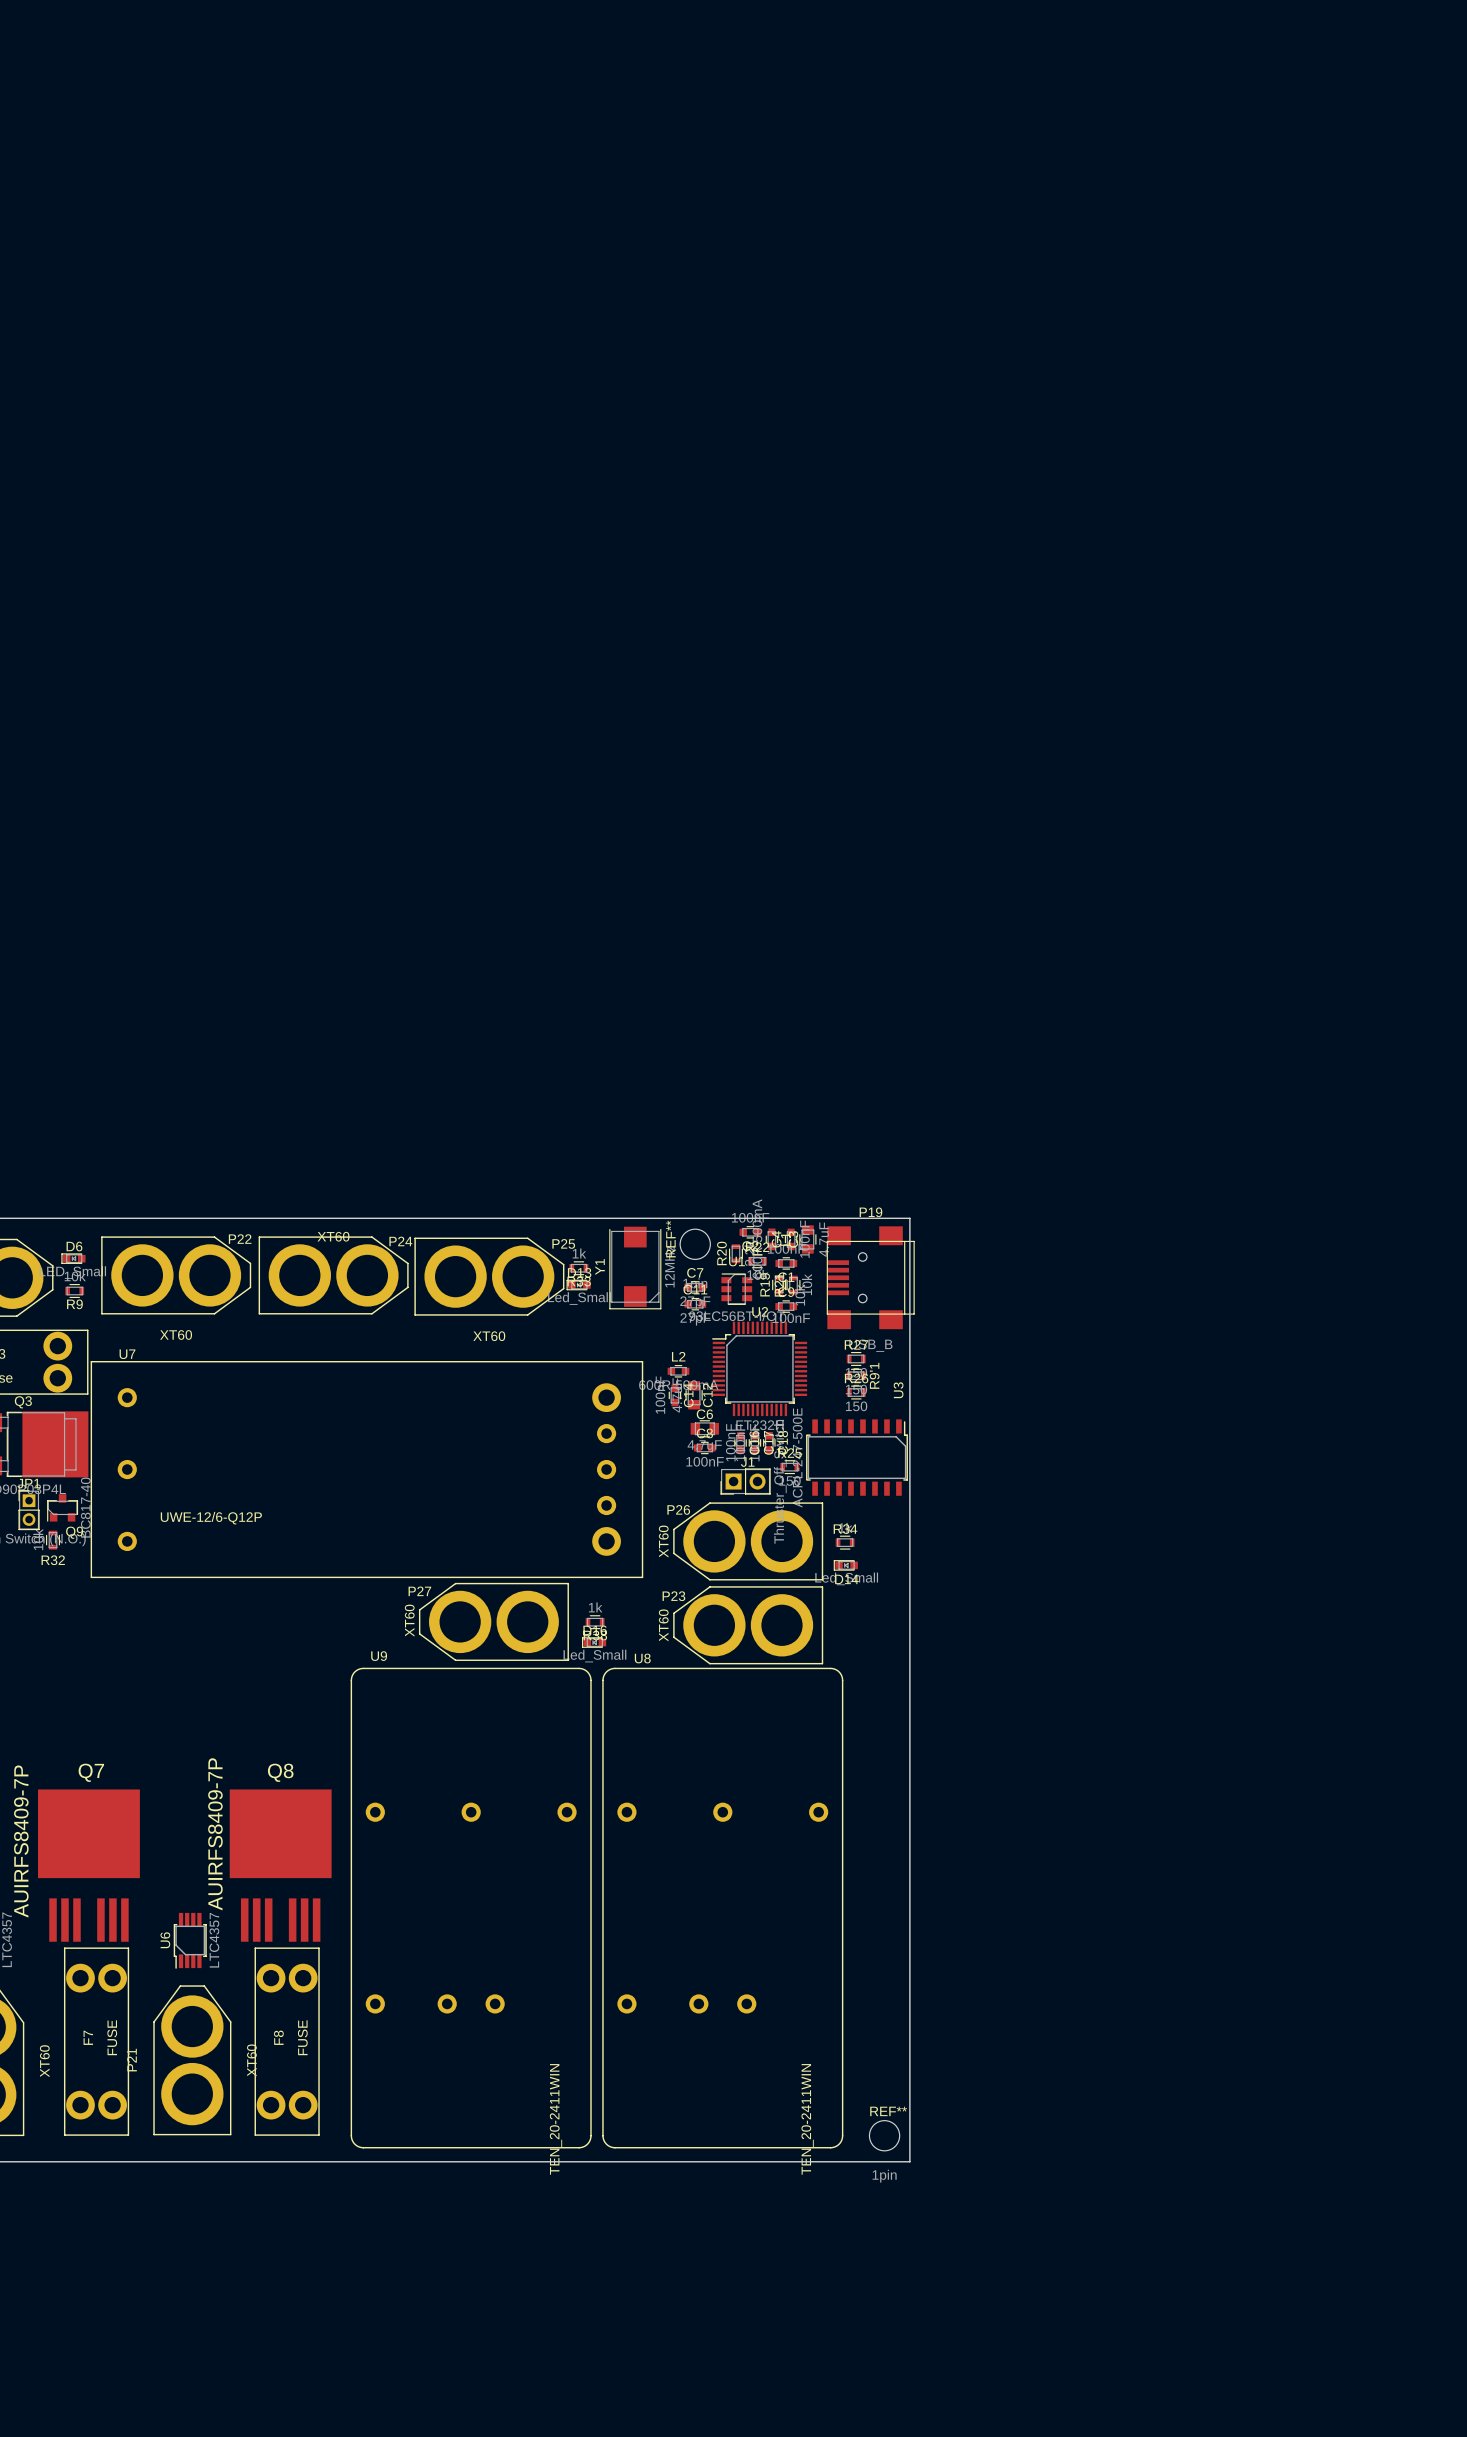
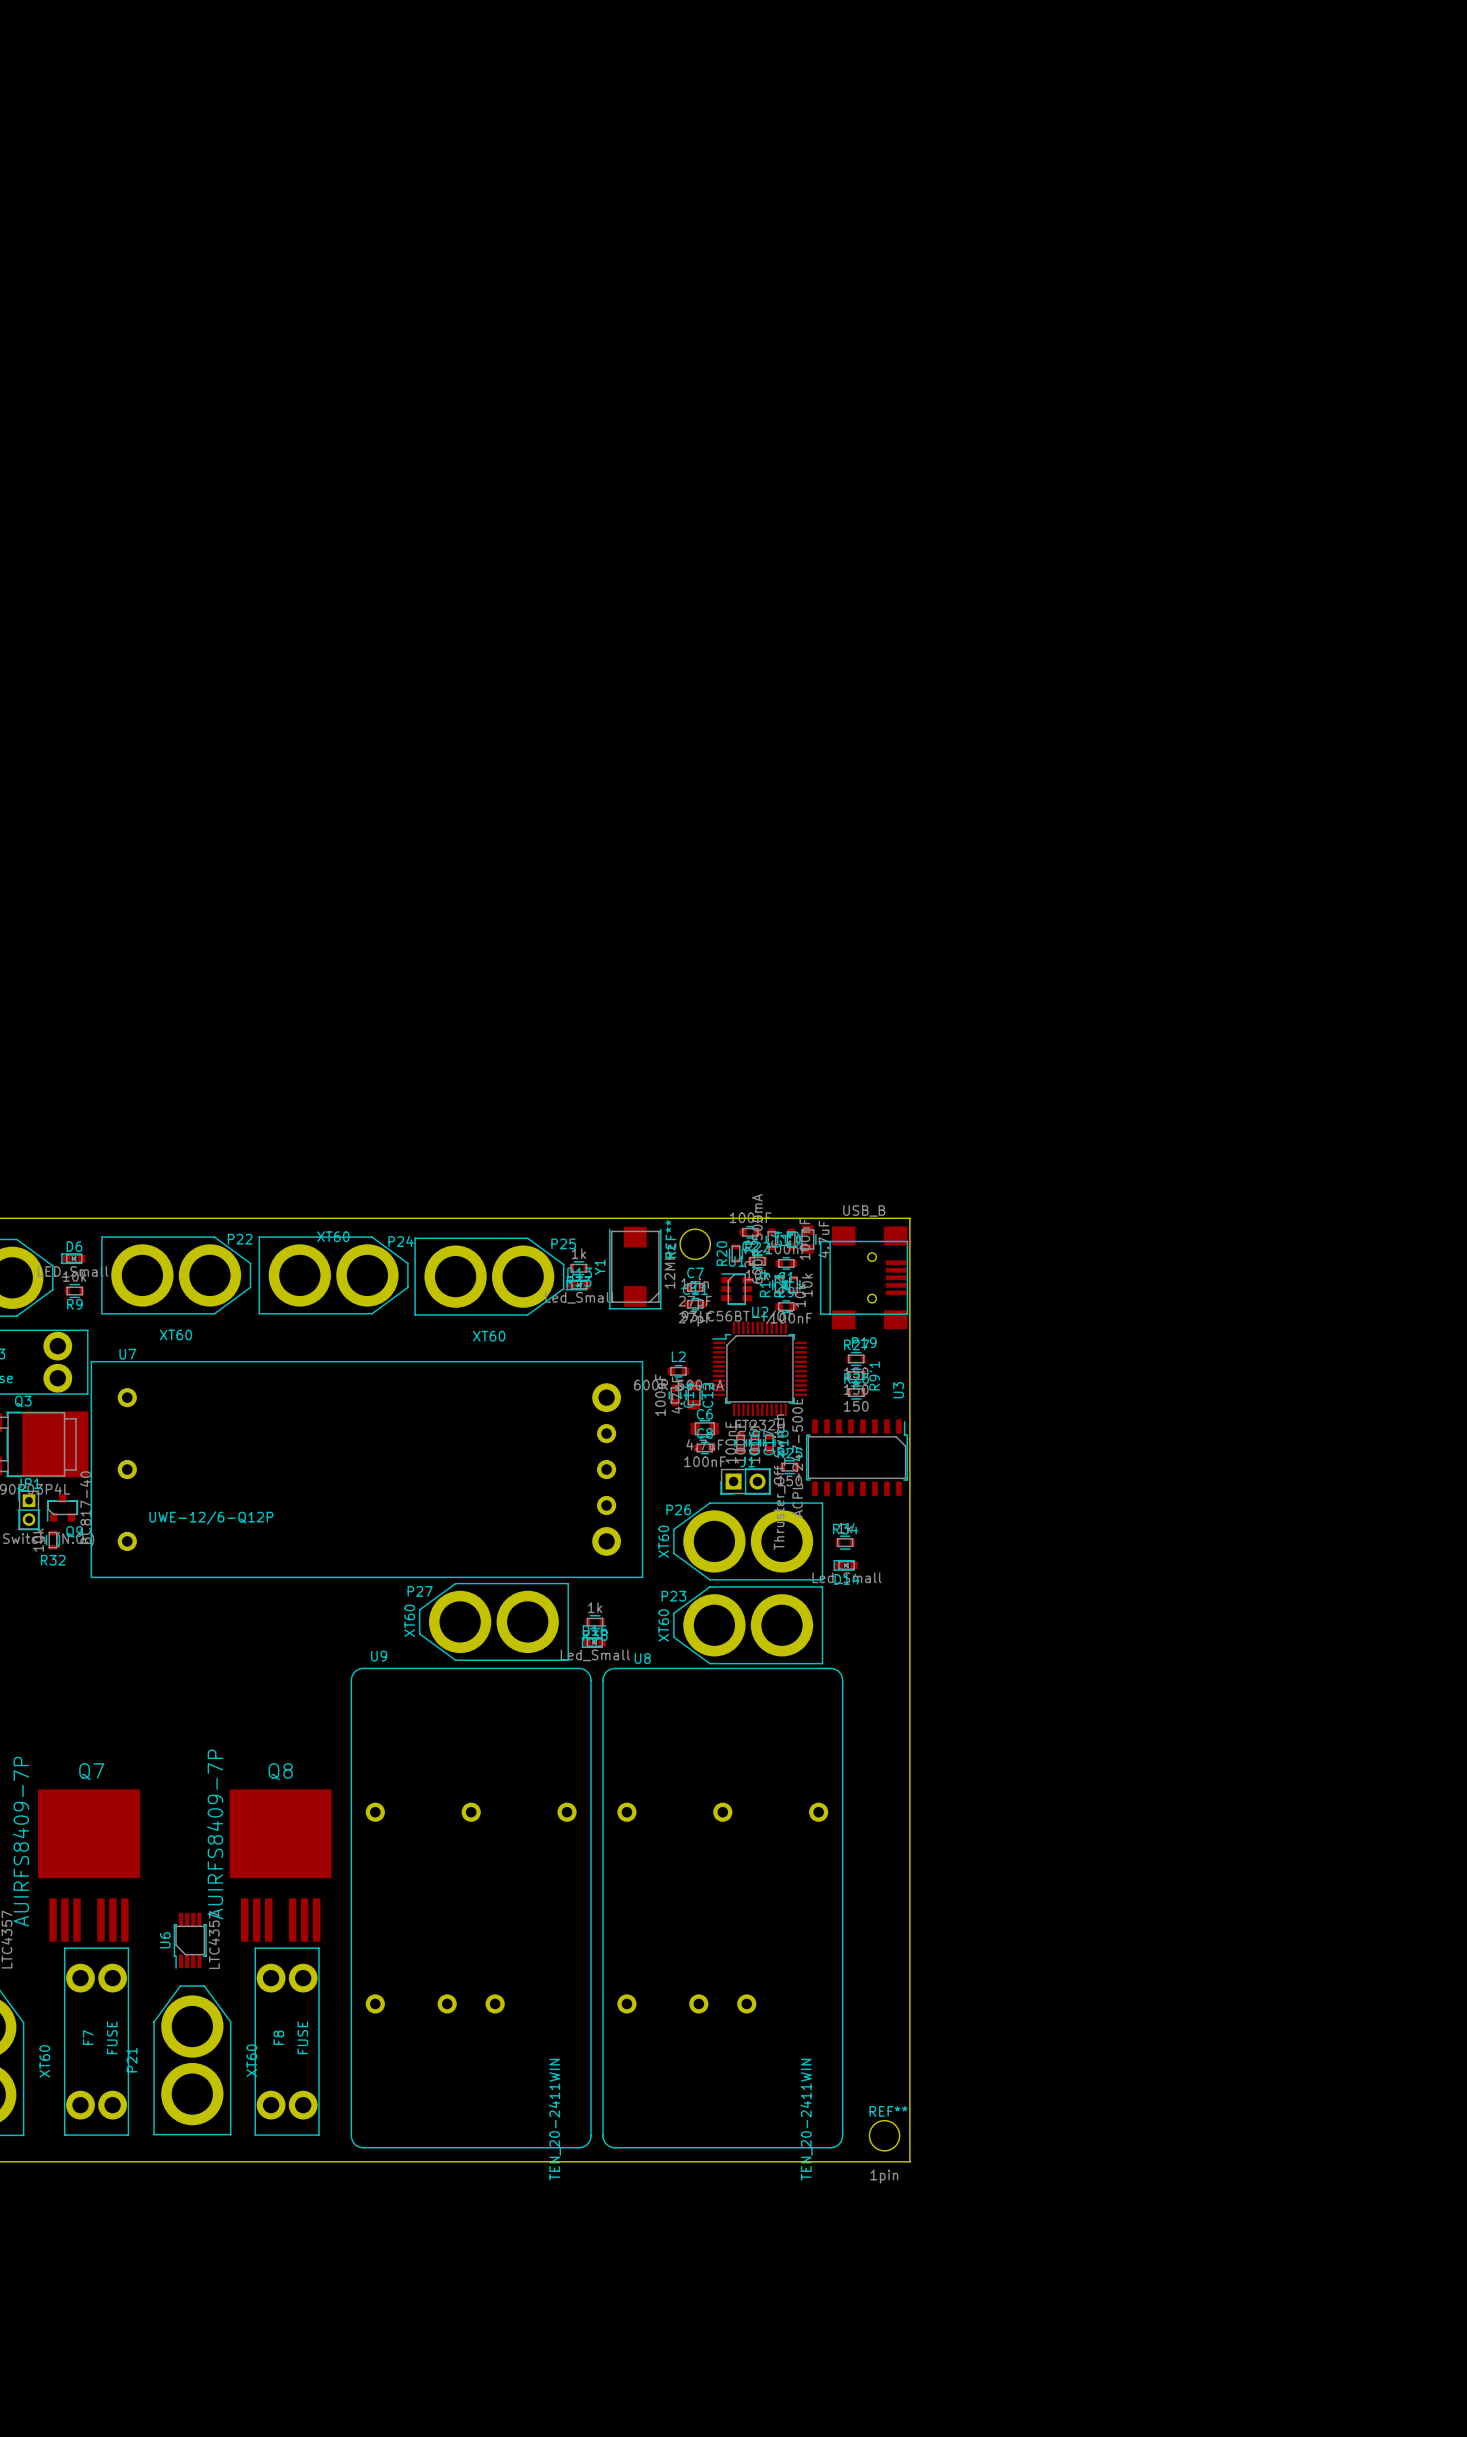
P19 rotation: 0° (870, 1277) -> 180° (864, 1277)

